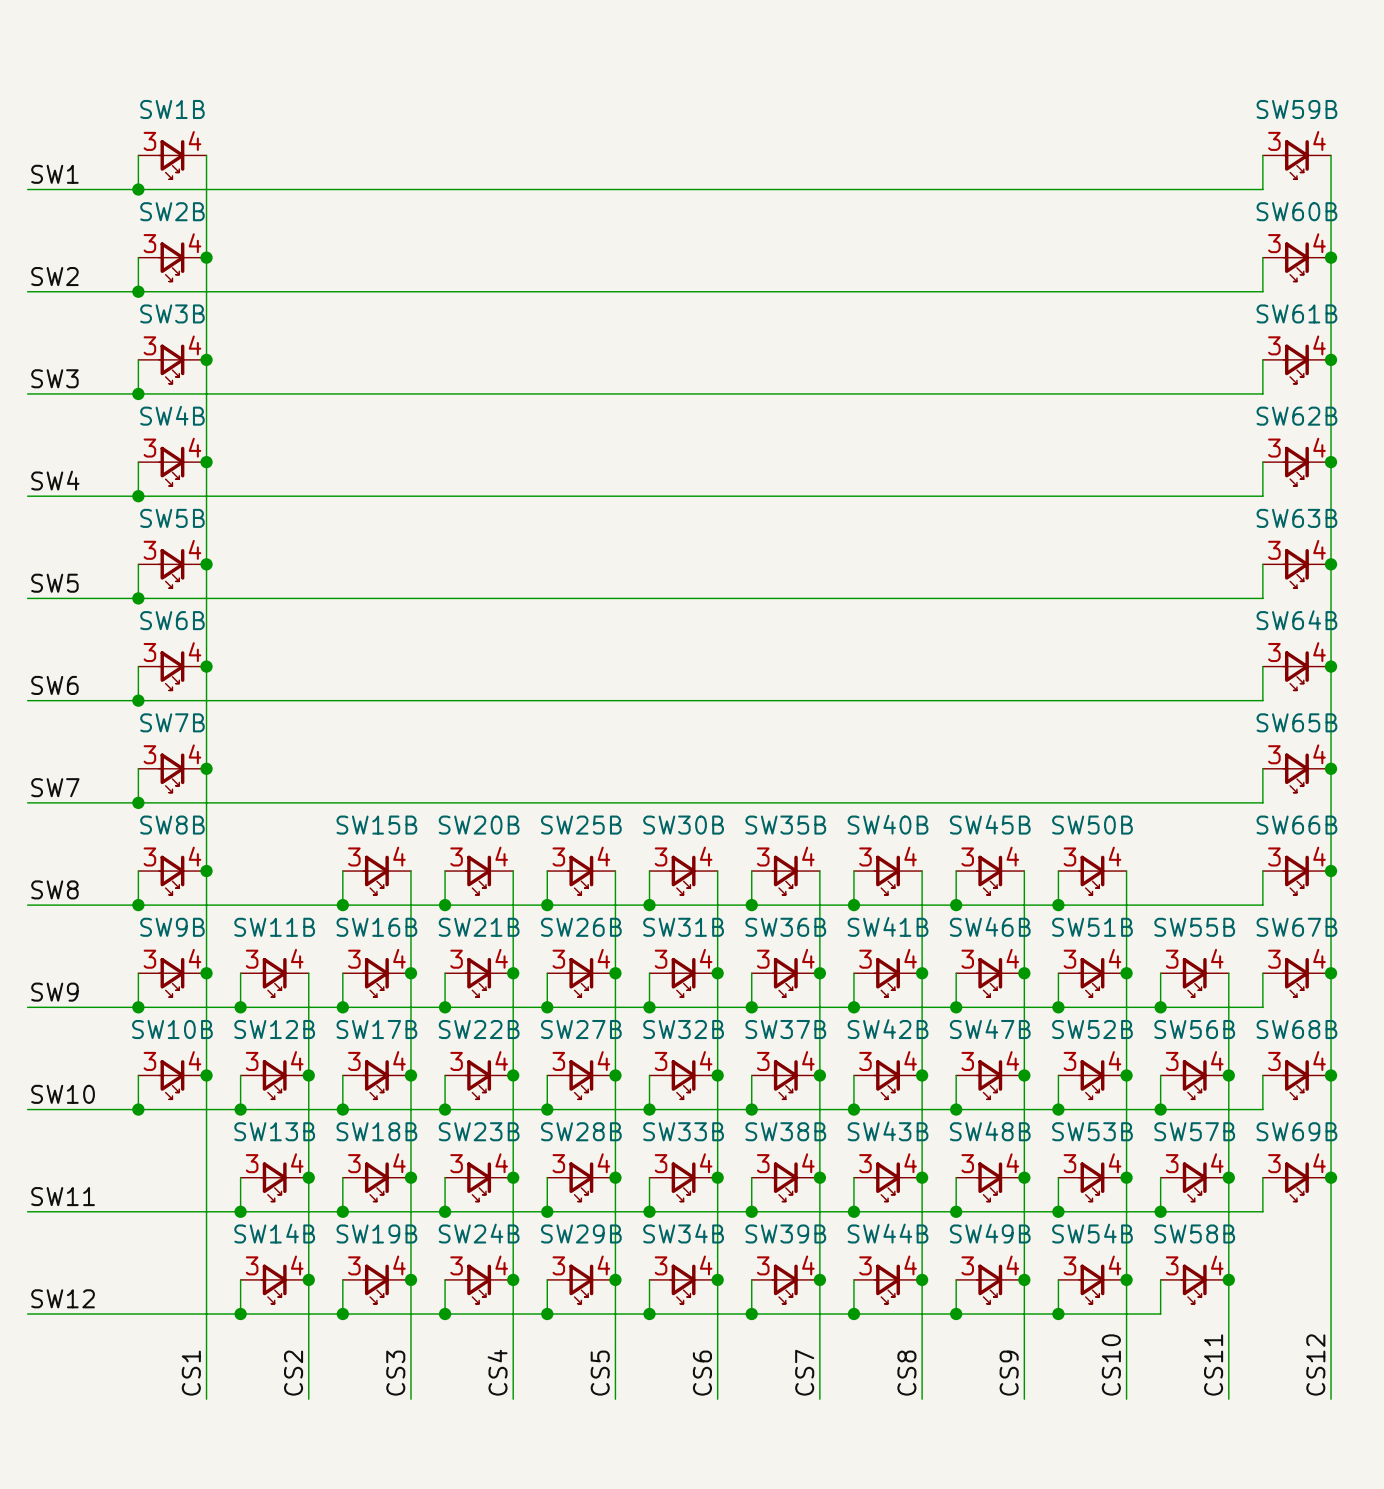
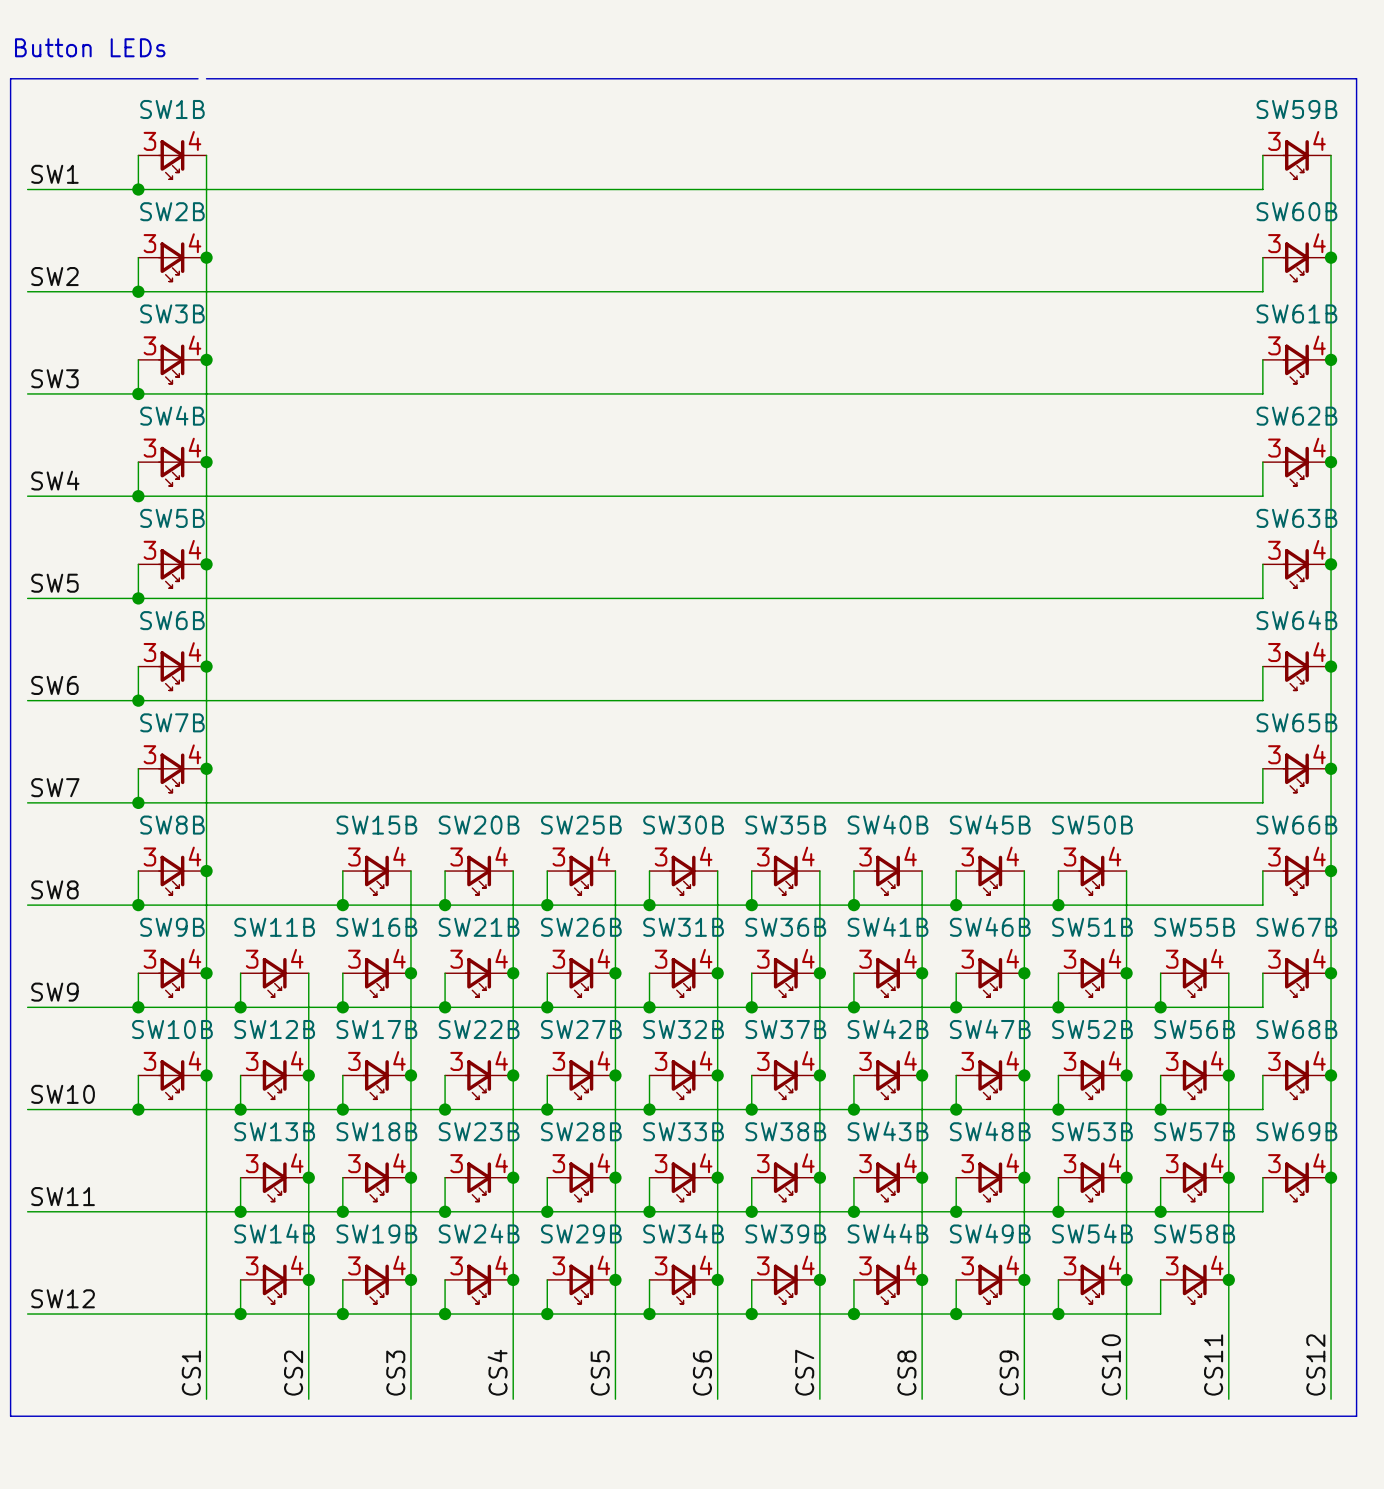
text: none -> Button LEDs (90, 47)
line: none -> (198, 78) (10, 78) (10, 1416) (1356, 1416) (1356, 78) (206, 78)

